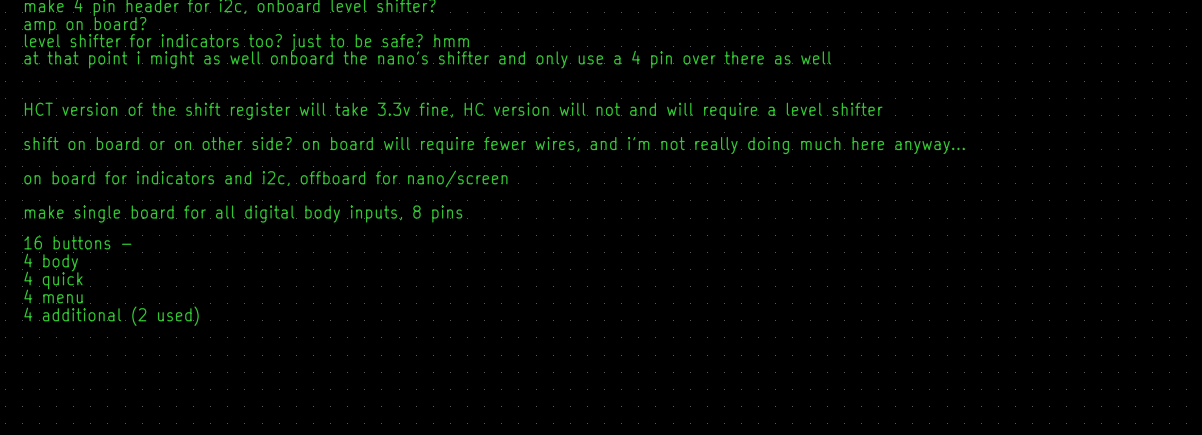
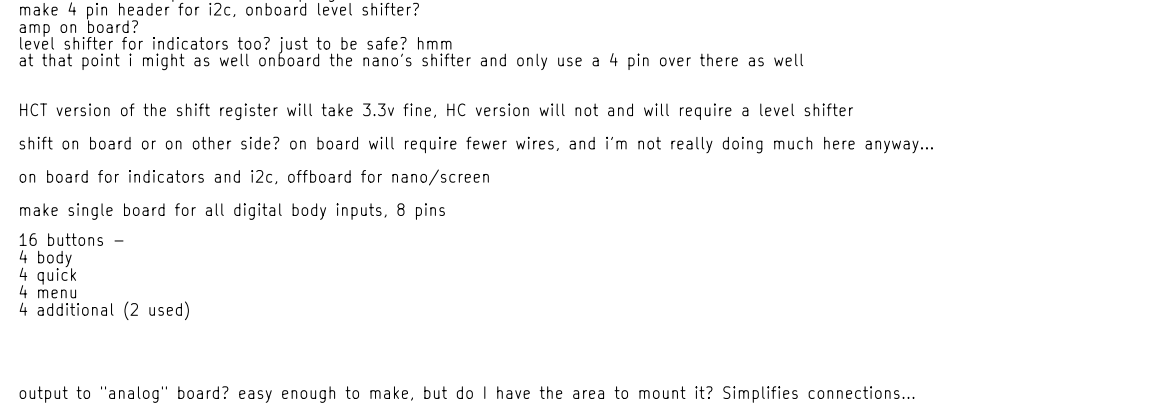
text: none -> output to "analog" board? easy enough to make, but do I have the area to mount it? Simplifies connections... (467, 394)

